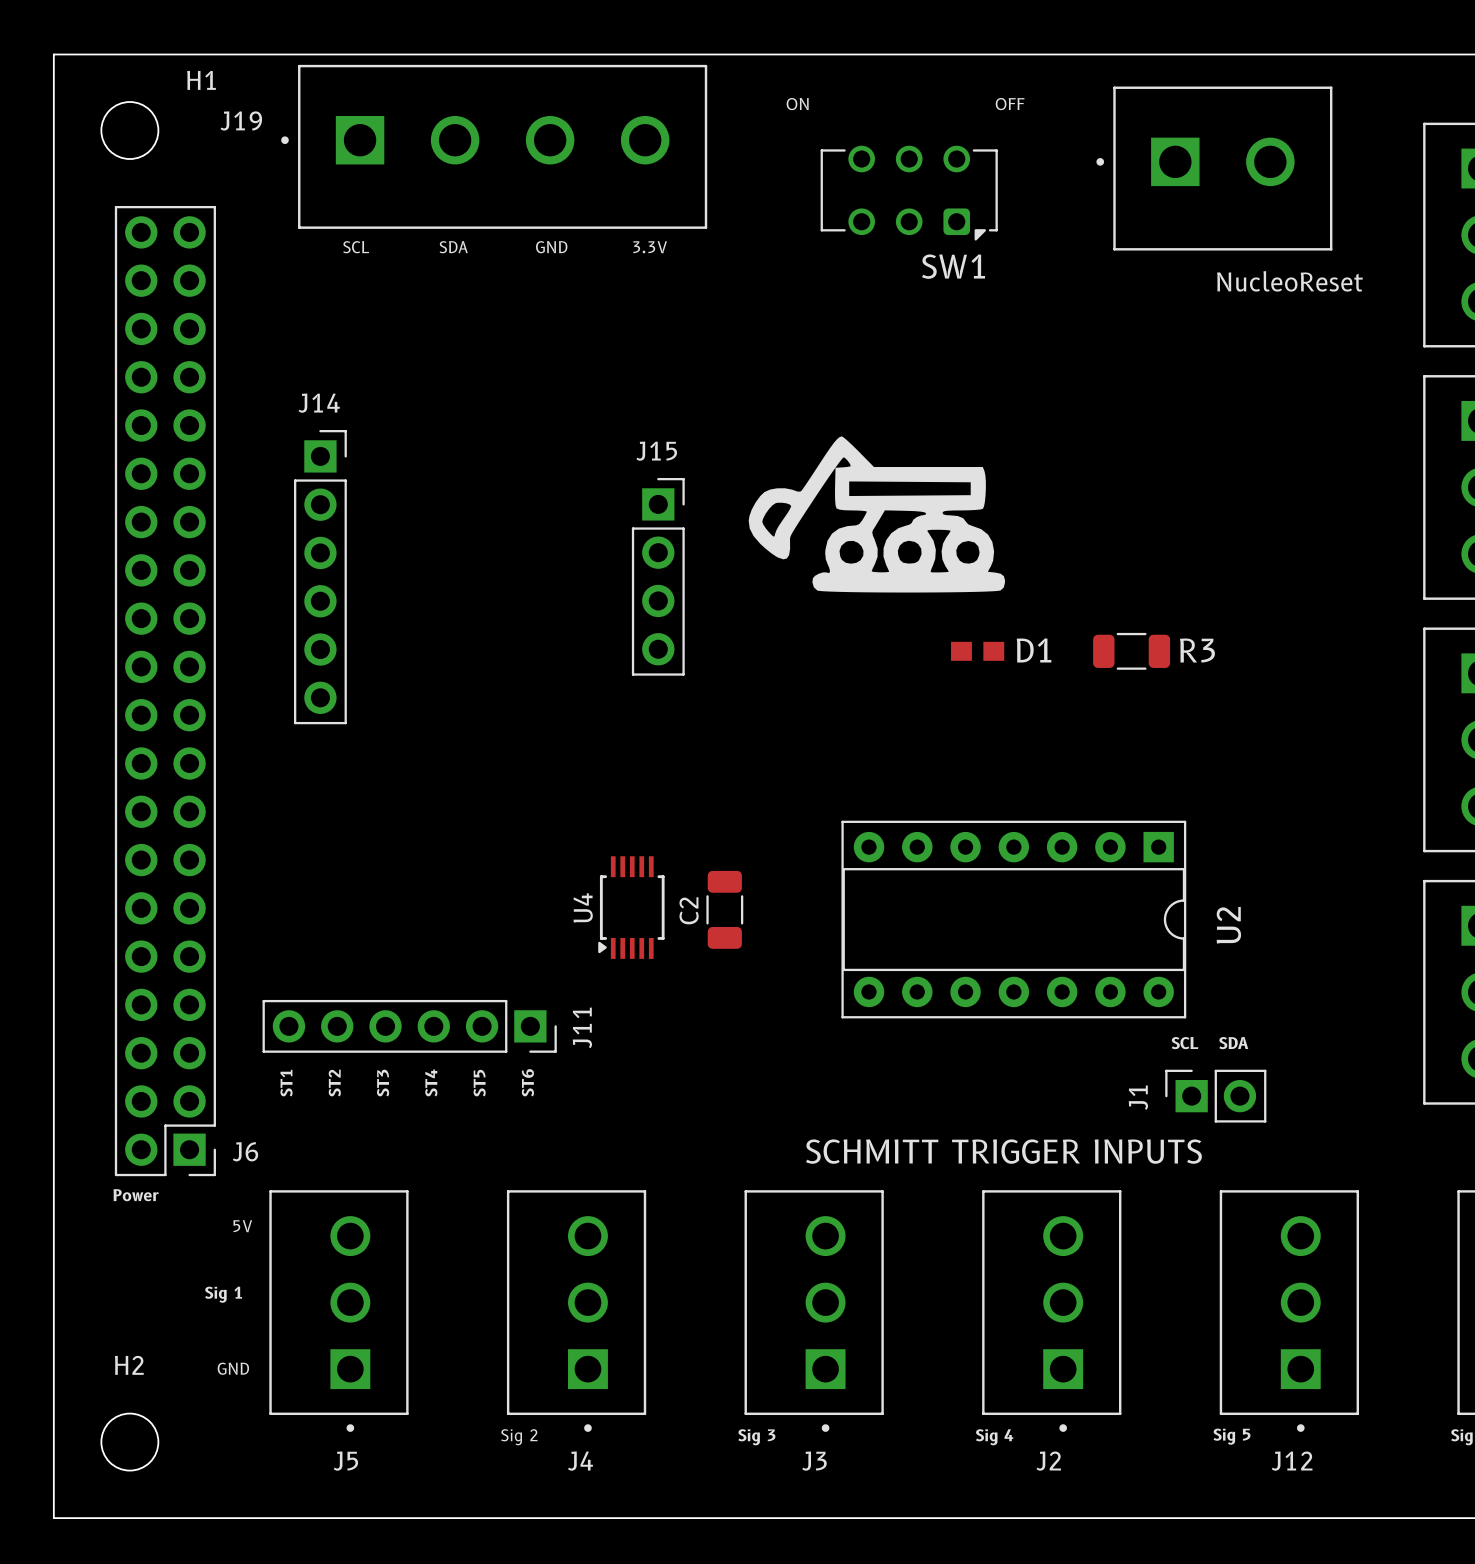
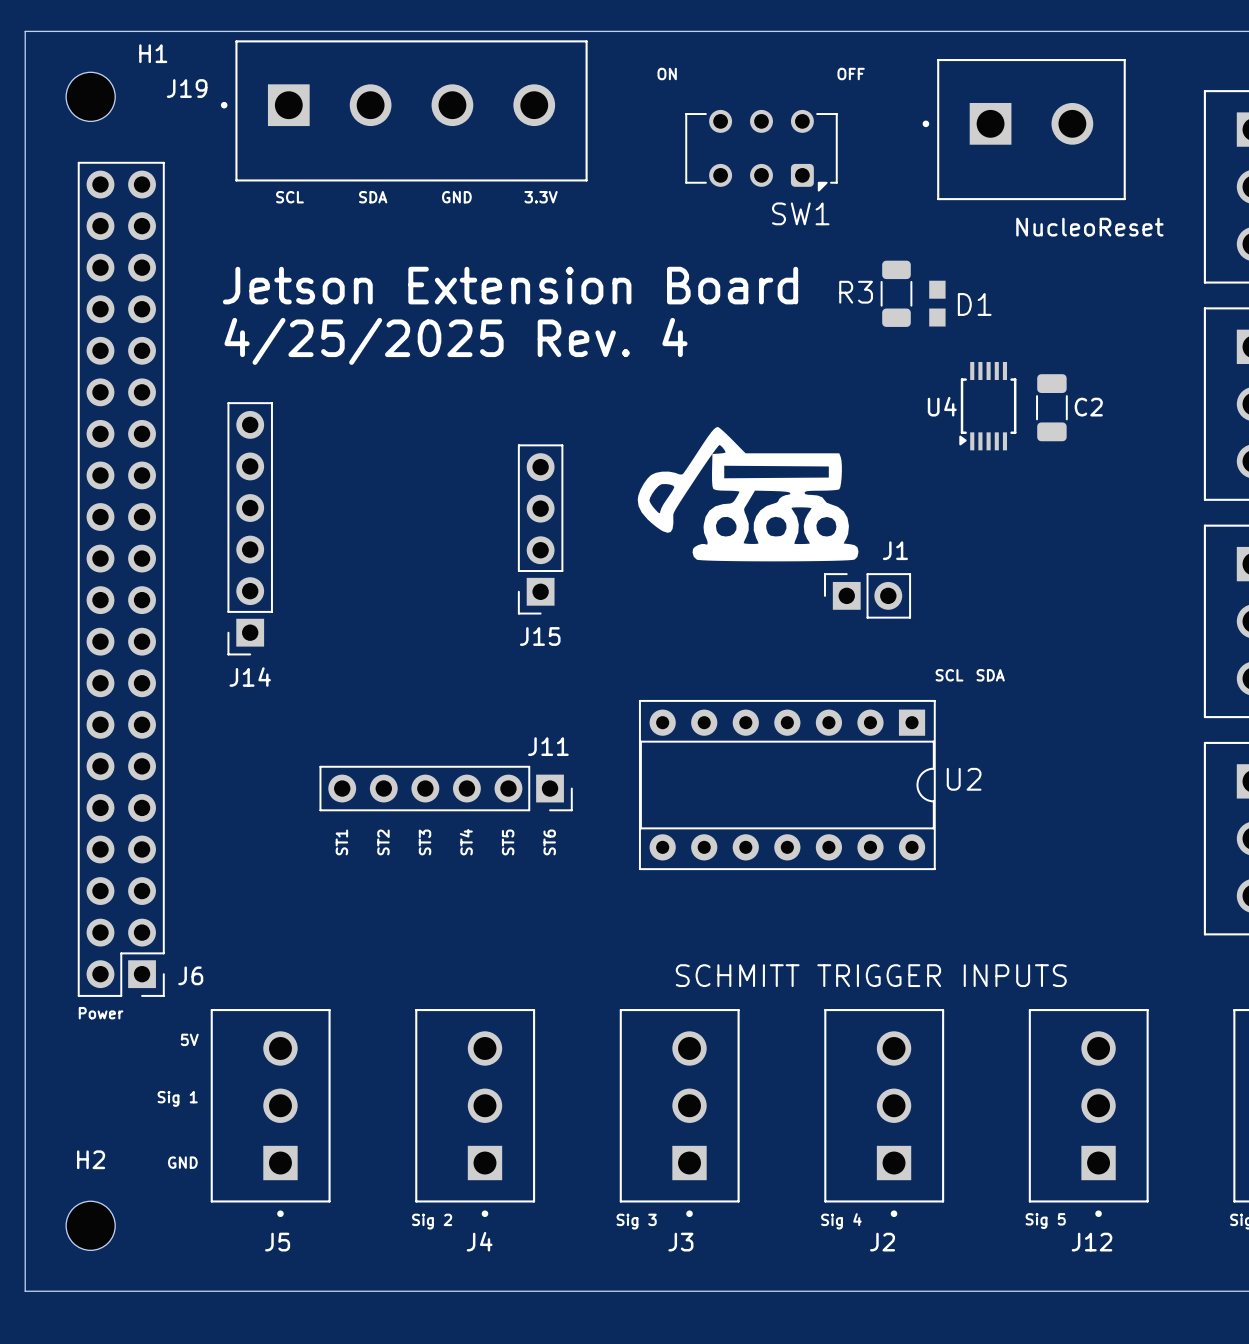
text: none -> Jetson Extension Board (510, 285)
text: none -> 4/25/2025 Rev. 4 (456, 341)
drawing position: (876, 514) -> (748, 494)
J15 rotation: 0° (658, 576) -> 180° (540, 529)
J14 rotation: 0° (320, 577) -> 180° (250, 528)
R3 name position: R3 (1197, 650) -> R3 (856, 292)
D1 rotation: 0° (977, 651) -> 90° clockwise (937, 303)
D1 position: (977, 651) -> (937, 303)
R3 rotation: 0° (1131, 651) -> 90° clockwise (896, 293)
R3 position: (1131, 651) -> (896, 293)
U4 name rotation: 0° (583, 907) -> 90° clockwise (942, 406)
U4 position: (631, 907) -> (987, 406)
C2 position: (724, 909) -> (1051, 407)
C2 name rotation: 0° (689, 910) -> 90° clockwise (1088, 407)
C2 name position: C2 (689, 910) -> C2 (1088, 407)
part position: (1013, 919) -> (787, 785)
text rotation: 0° (1228, 925) -> 90° clockwise (964, 779)
text position: U2 (1228, 925) -> U2 (964, 779)
J11 position: (409, 1026) -> (446, 788)
J11 name rotation: 0° (582, 1027) -> 90° clockwise (548, 746)
J11 name position: J11 (582, 1027) -> J11 (548, 746)
text position: SCL (1185, 1043) -> SCL (949, 675)
text position: SDA (1233, 1043) -> SDA (990, 675)
text position: ST4 (431, 1082) -> ST4 (466, 842)
text position: ST6 (527, 1082) -> ST6 (549, 842)
text position: ST1 (286, 1083) -> ST1 (341, 842)
text position: ST2 (334, 1083) -> ST2 (383, 842)
text position: ST3 (383, 1083) -> ST3 (425, 842)
text position: ST5 (479, 1083) -> ST5 (508, 842)
J1 position: (1215, 1096) -> (867, 595)
J1 name rotation: 0° (1138, 1097) -> 90° clockwise (895, 550)
J1 name position: J1 (1138, 1097) -> J1 (895, 550)

